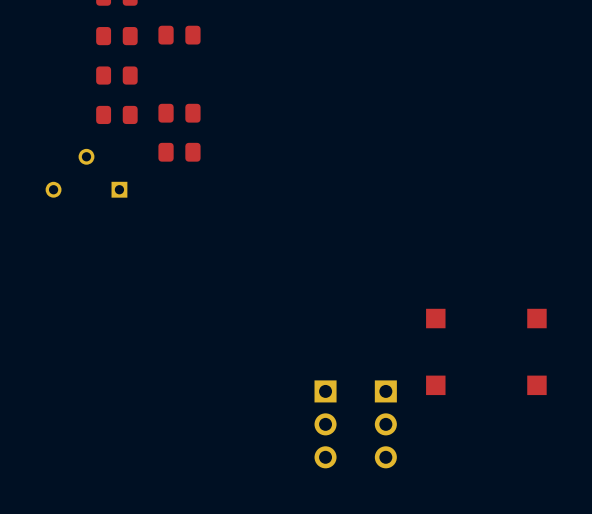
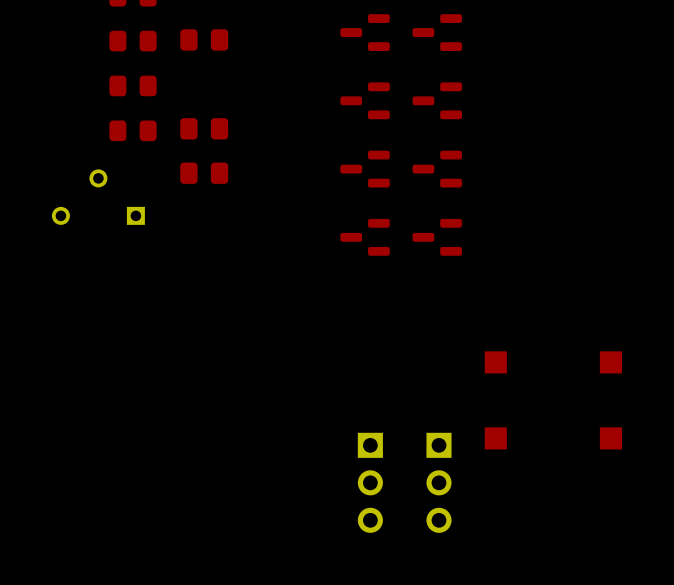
part: none -> (365, 32)
part: none -> (437, 32)
part: none -> (365, 100)
part: none -> (437, 100)
part: none -> (365, 169)
part: none -> (437, 169)
part: none -> (365, 237)
part: none -> (437, 237)

